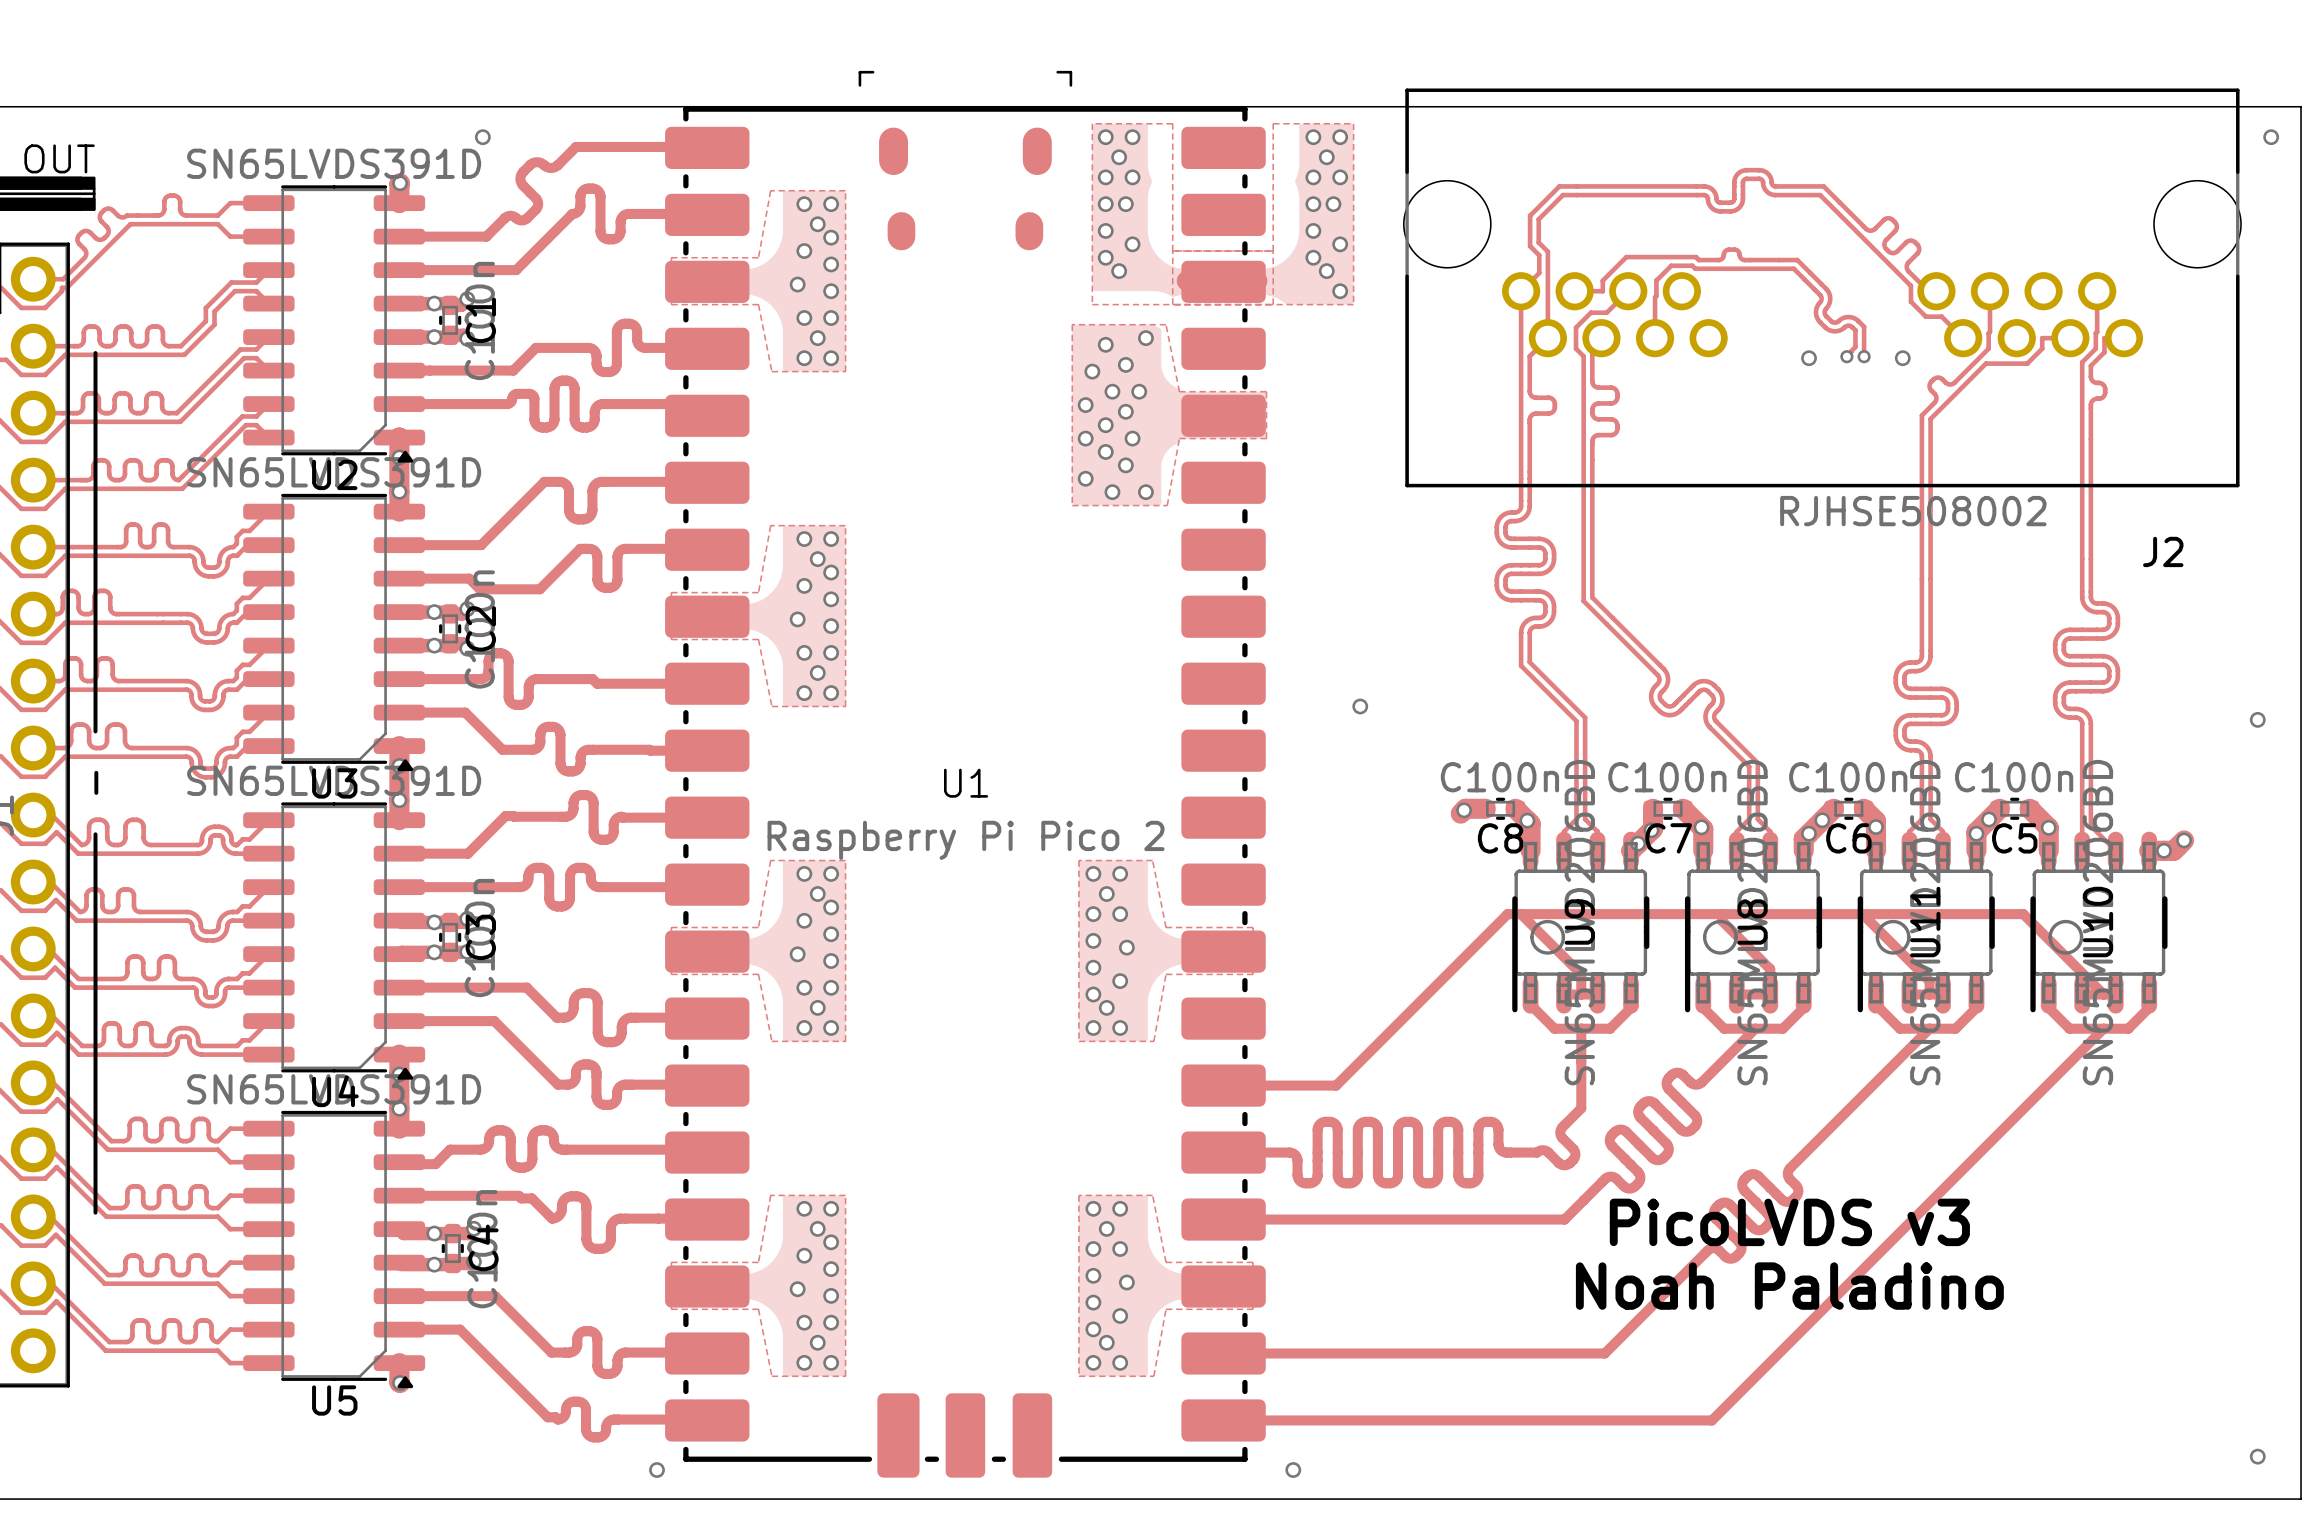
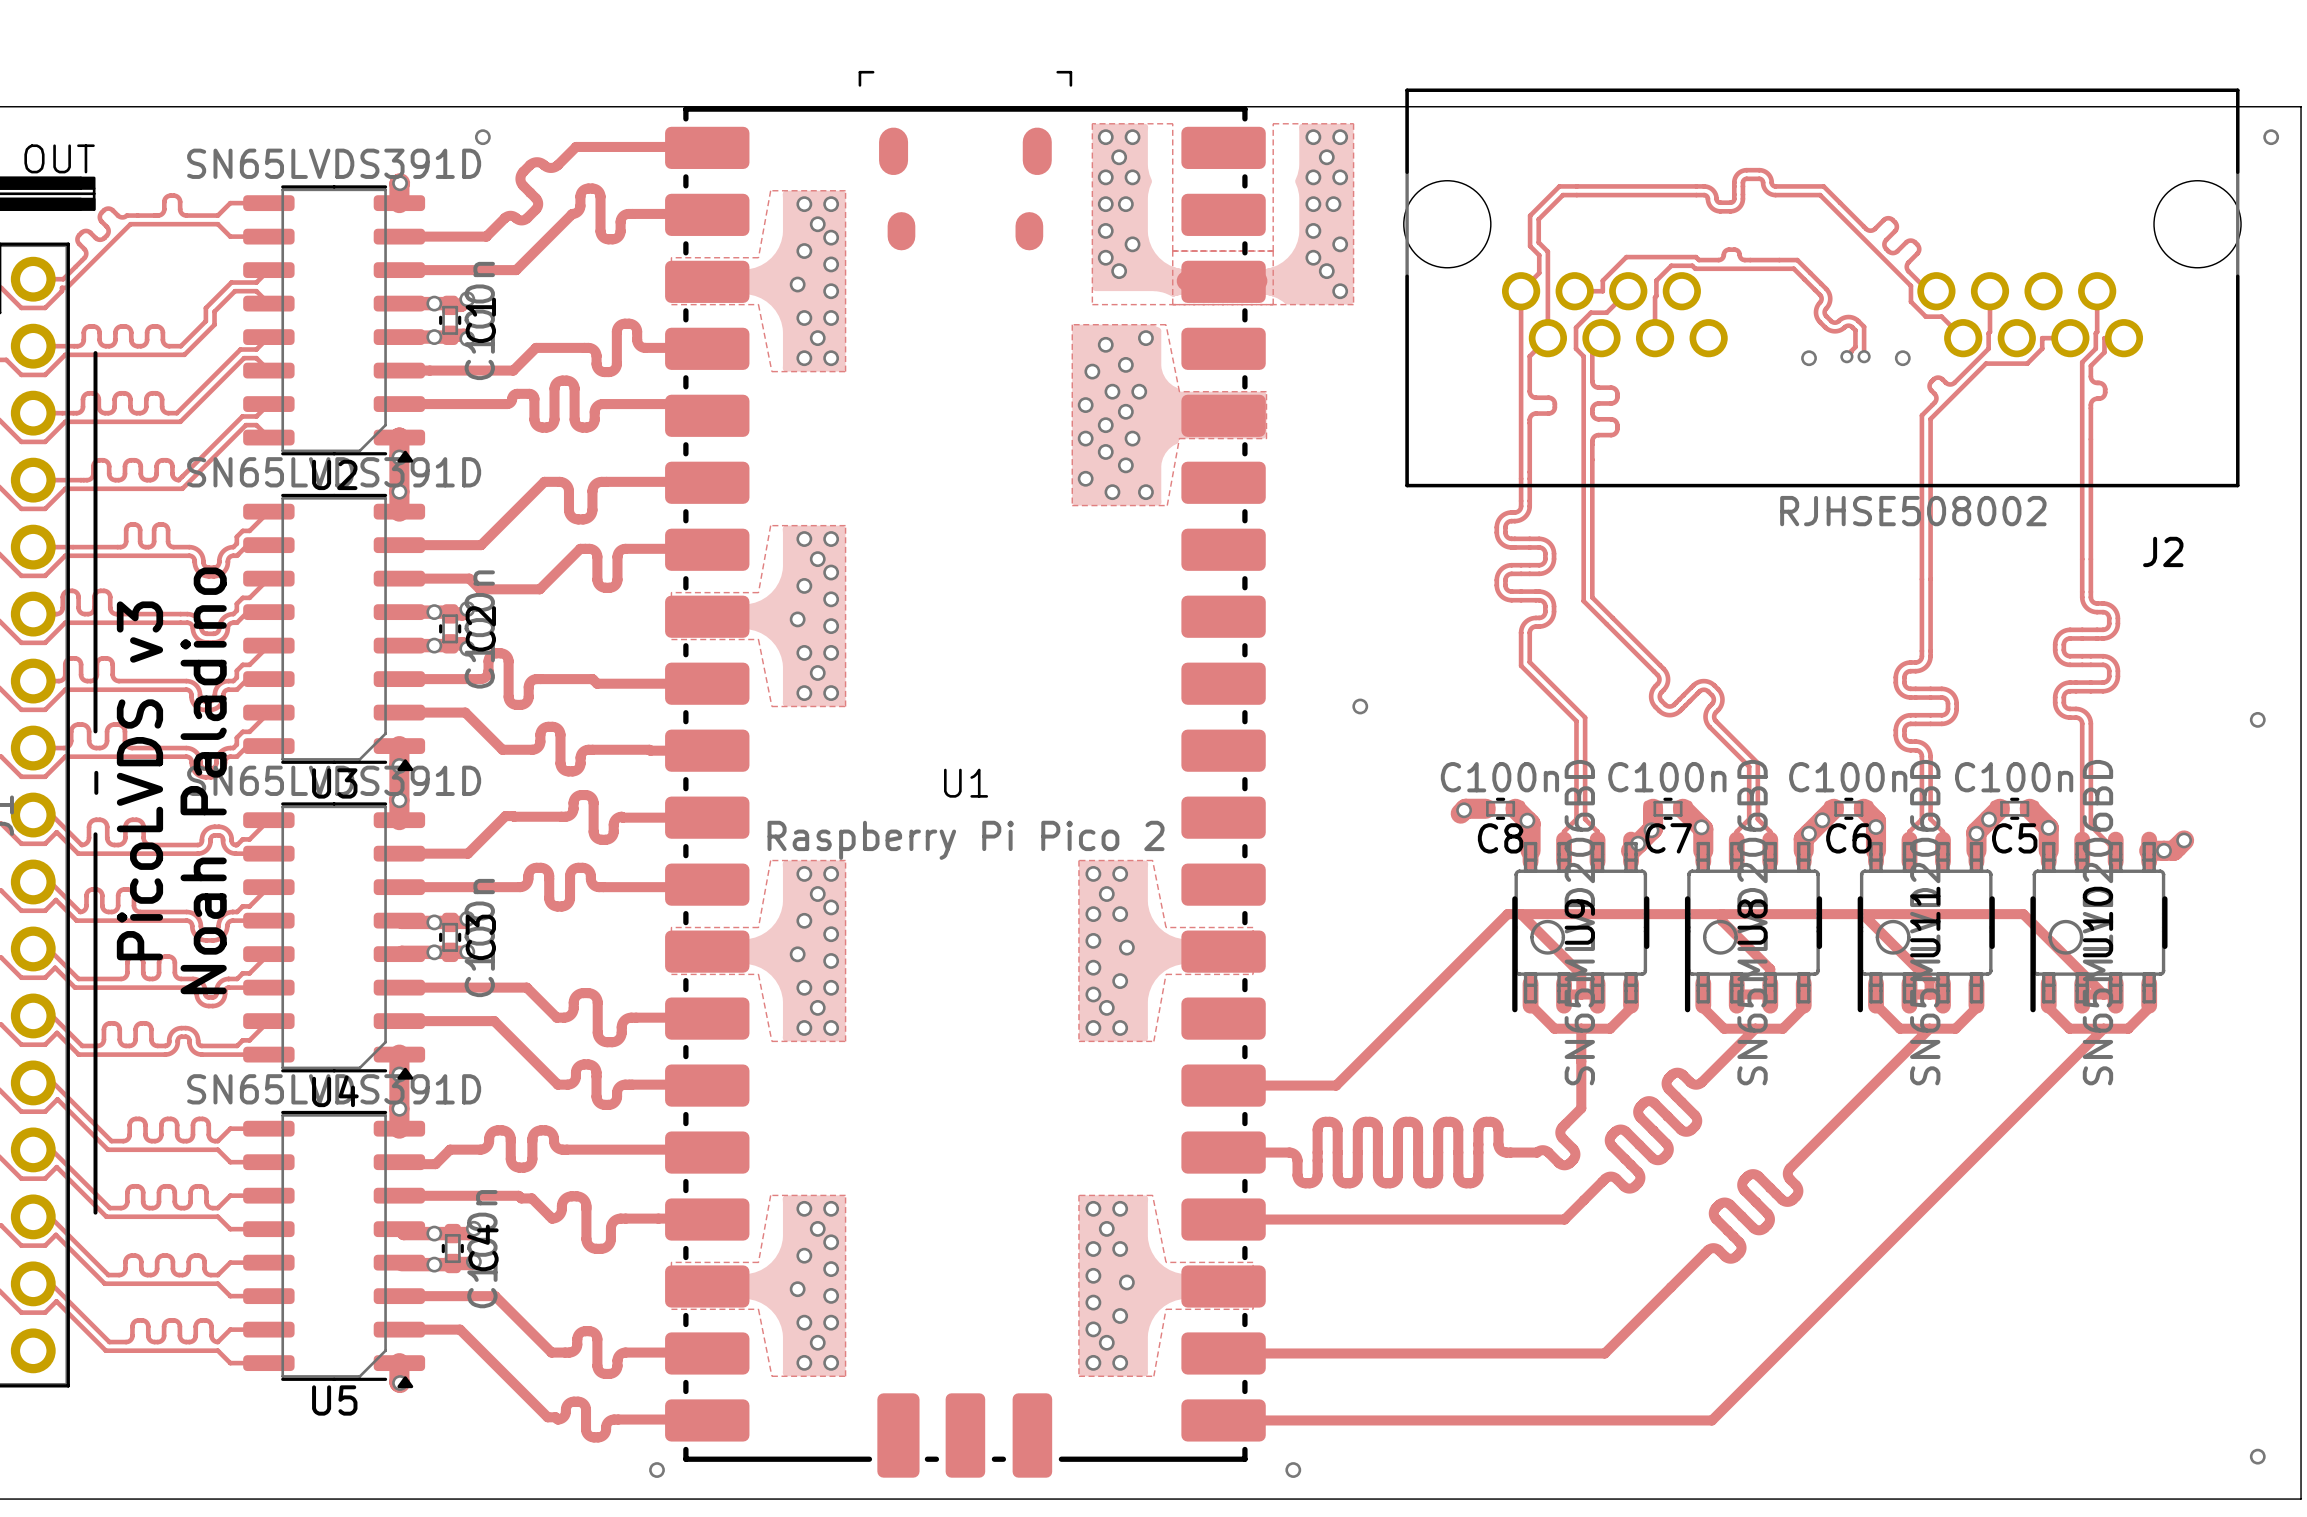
text: none -> PicoLVDS v3 (139, 780)
text: none -> Noah Paladino (203, 780)
text: PicoLVDS v3 (1789, 1222) -> none
text: Noah Paladino (1789, 1286) -> none

